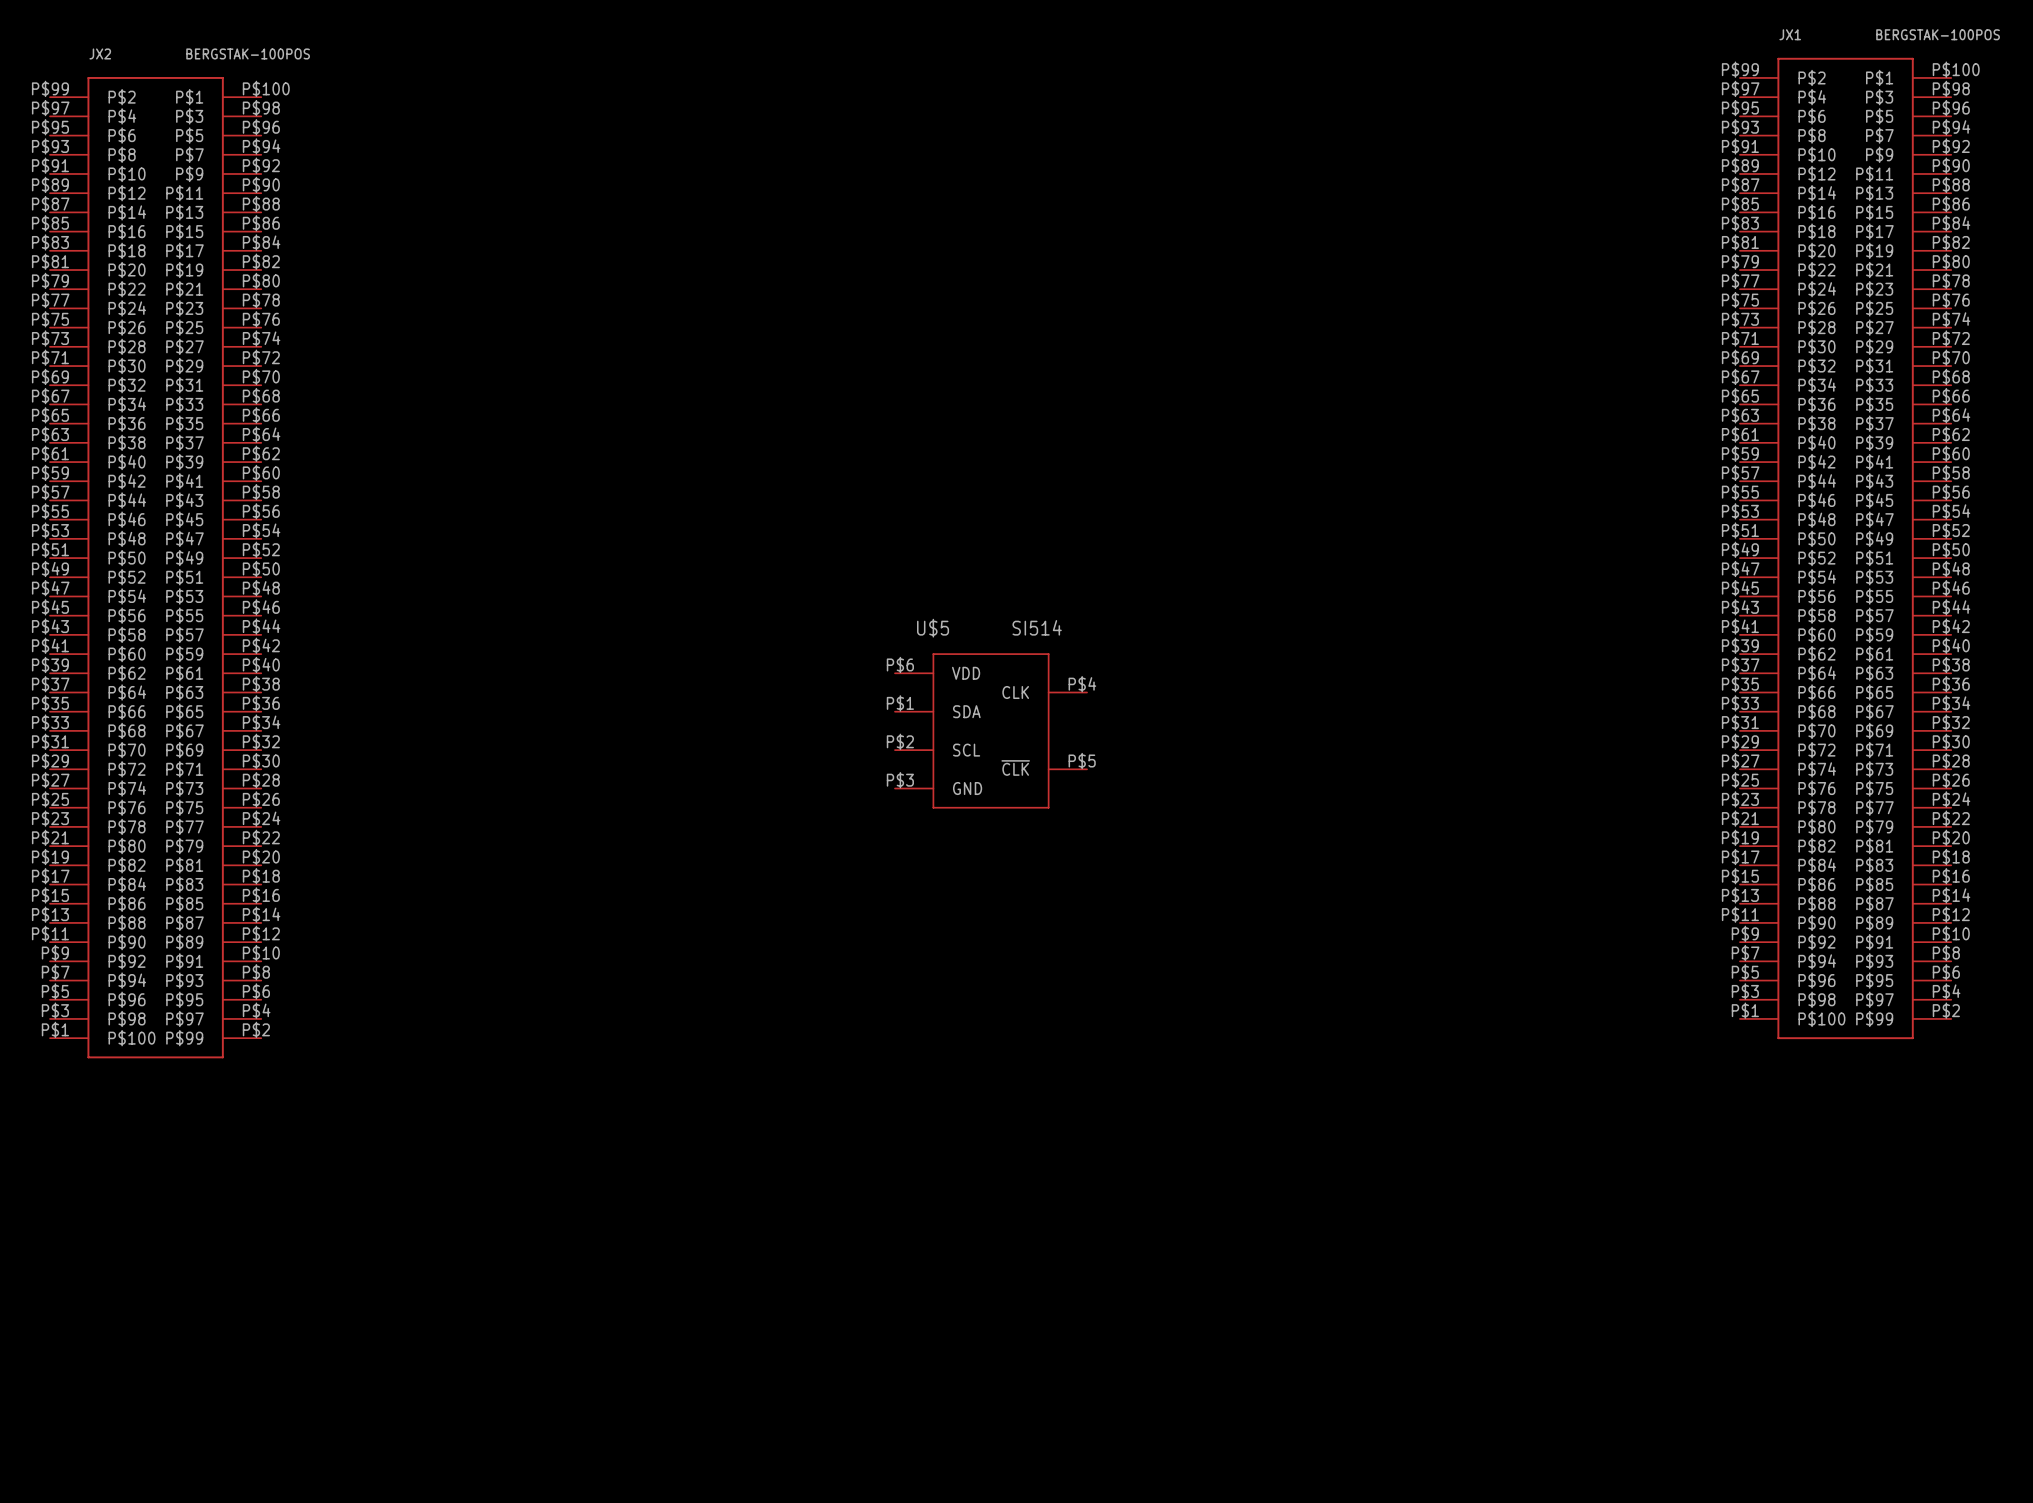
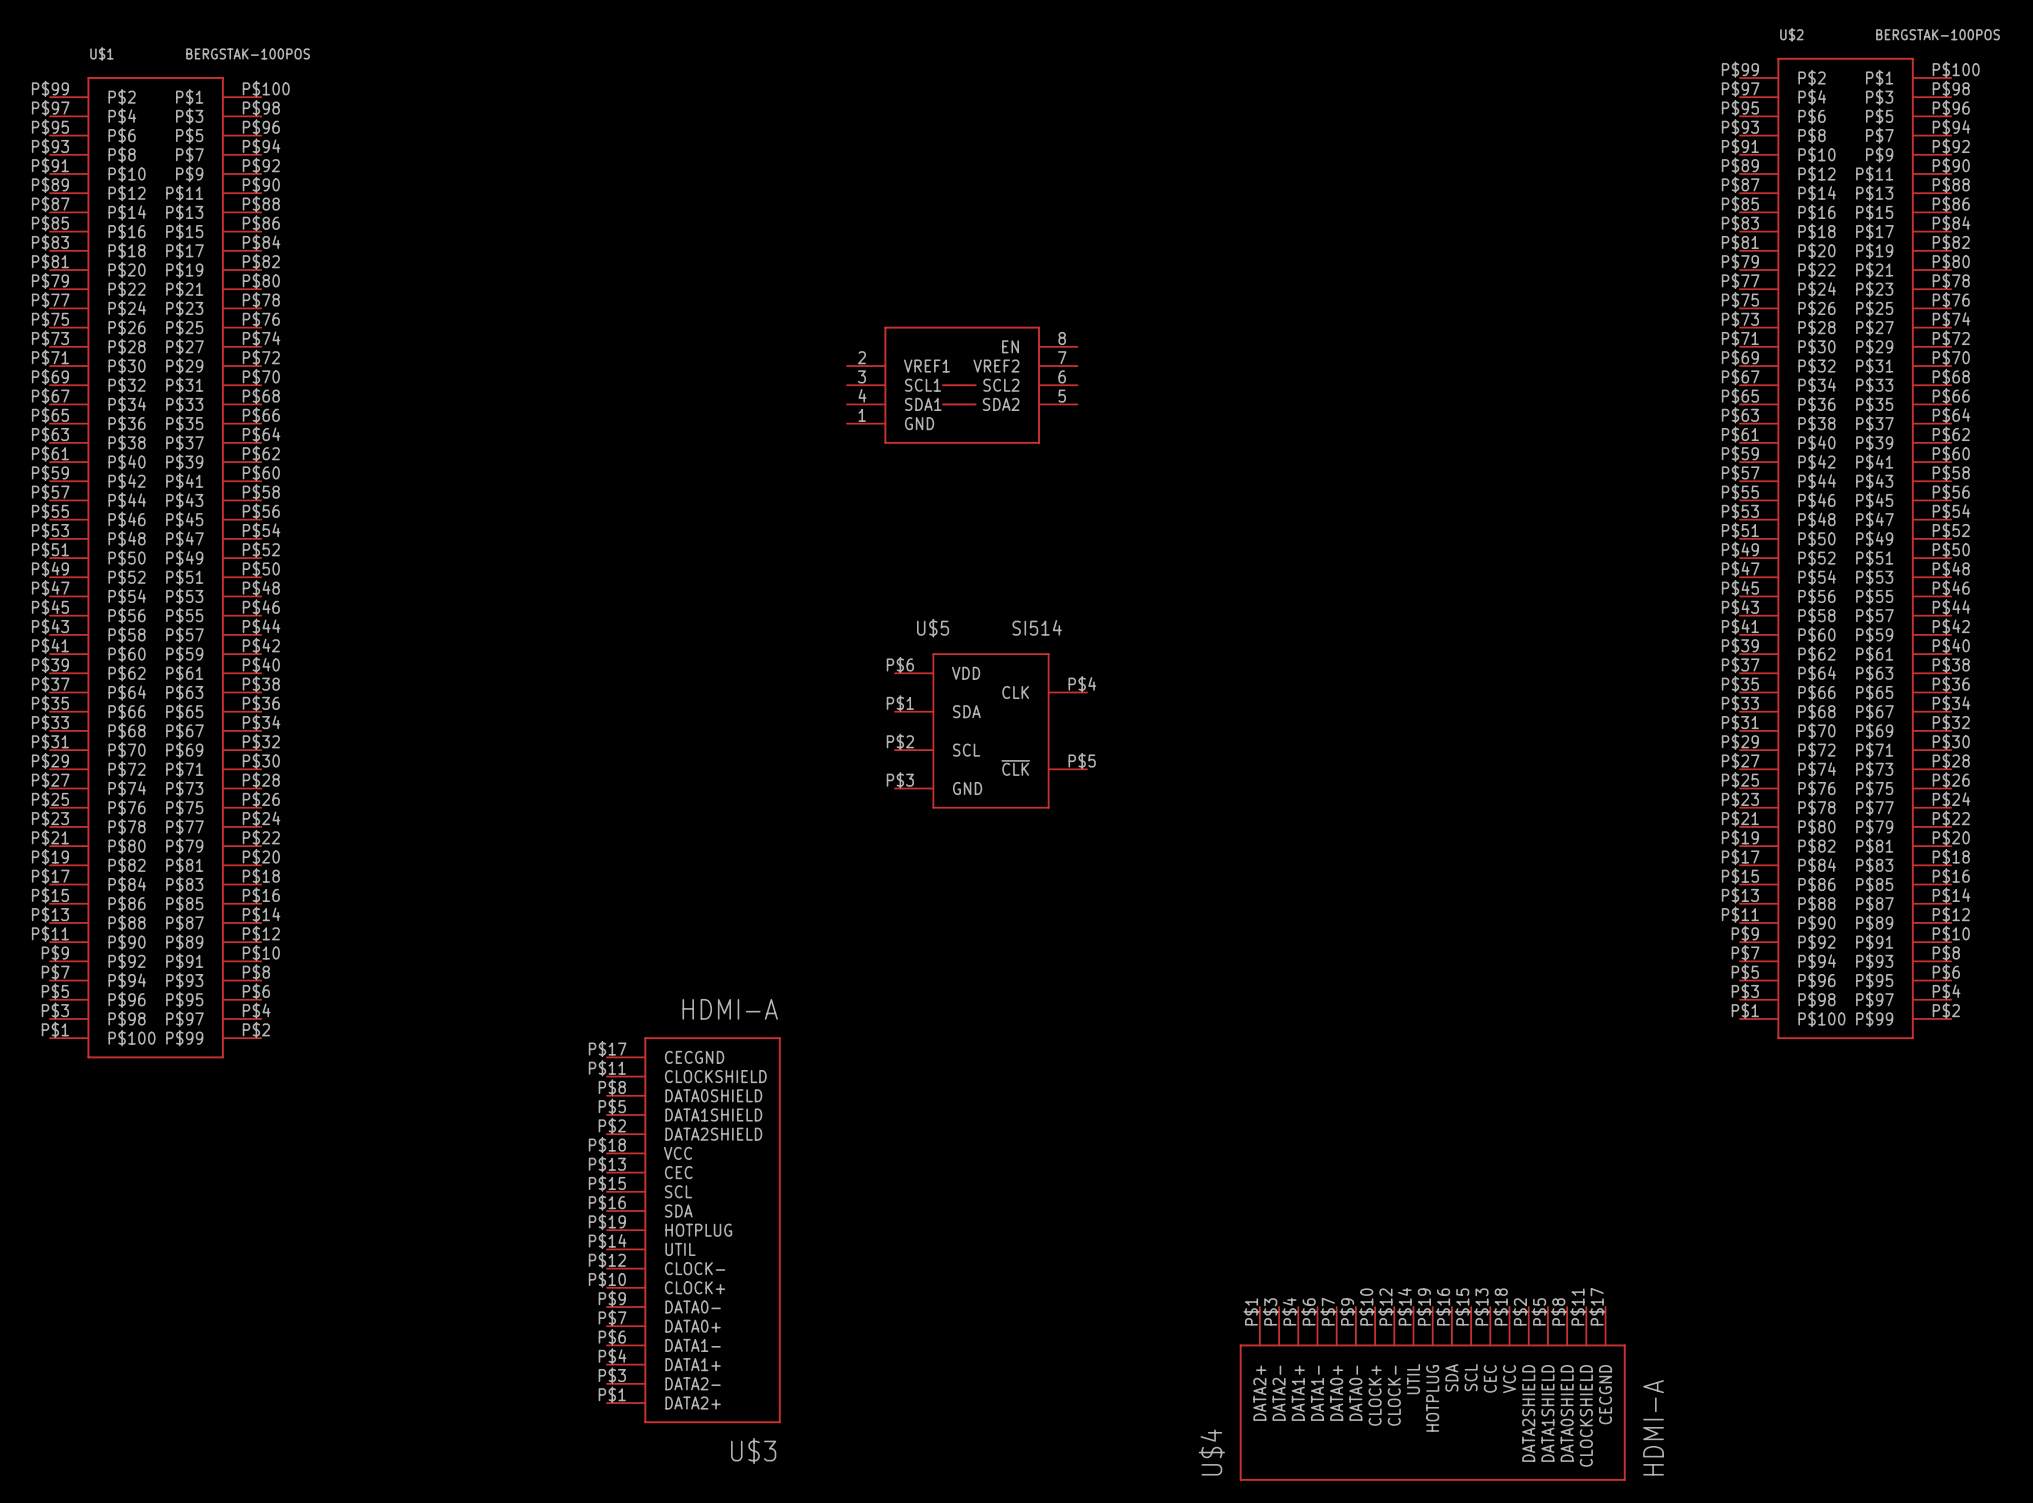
JX1 name: JX1 (1790, 34) -> U$2 (1791, 34)
JX2 name: JX2 (100, 53) -> U$1 (101, 53)
part: none -> (962, 385)
U$3: none -> HDMI-A (693, 1230)
U$4: none -> HDMI-A (1432, 1393)

